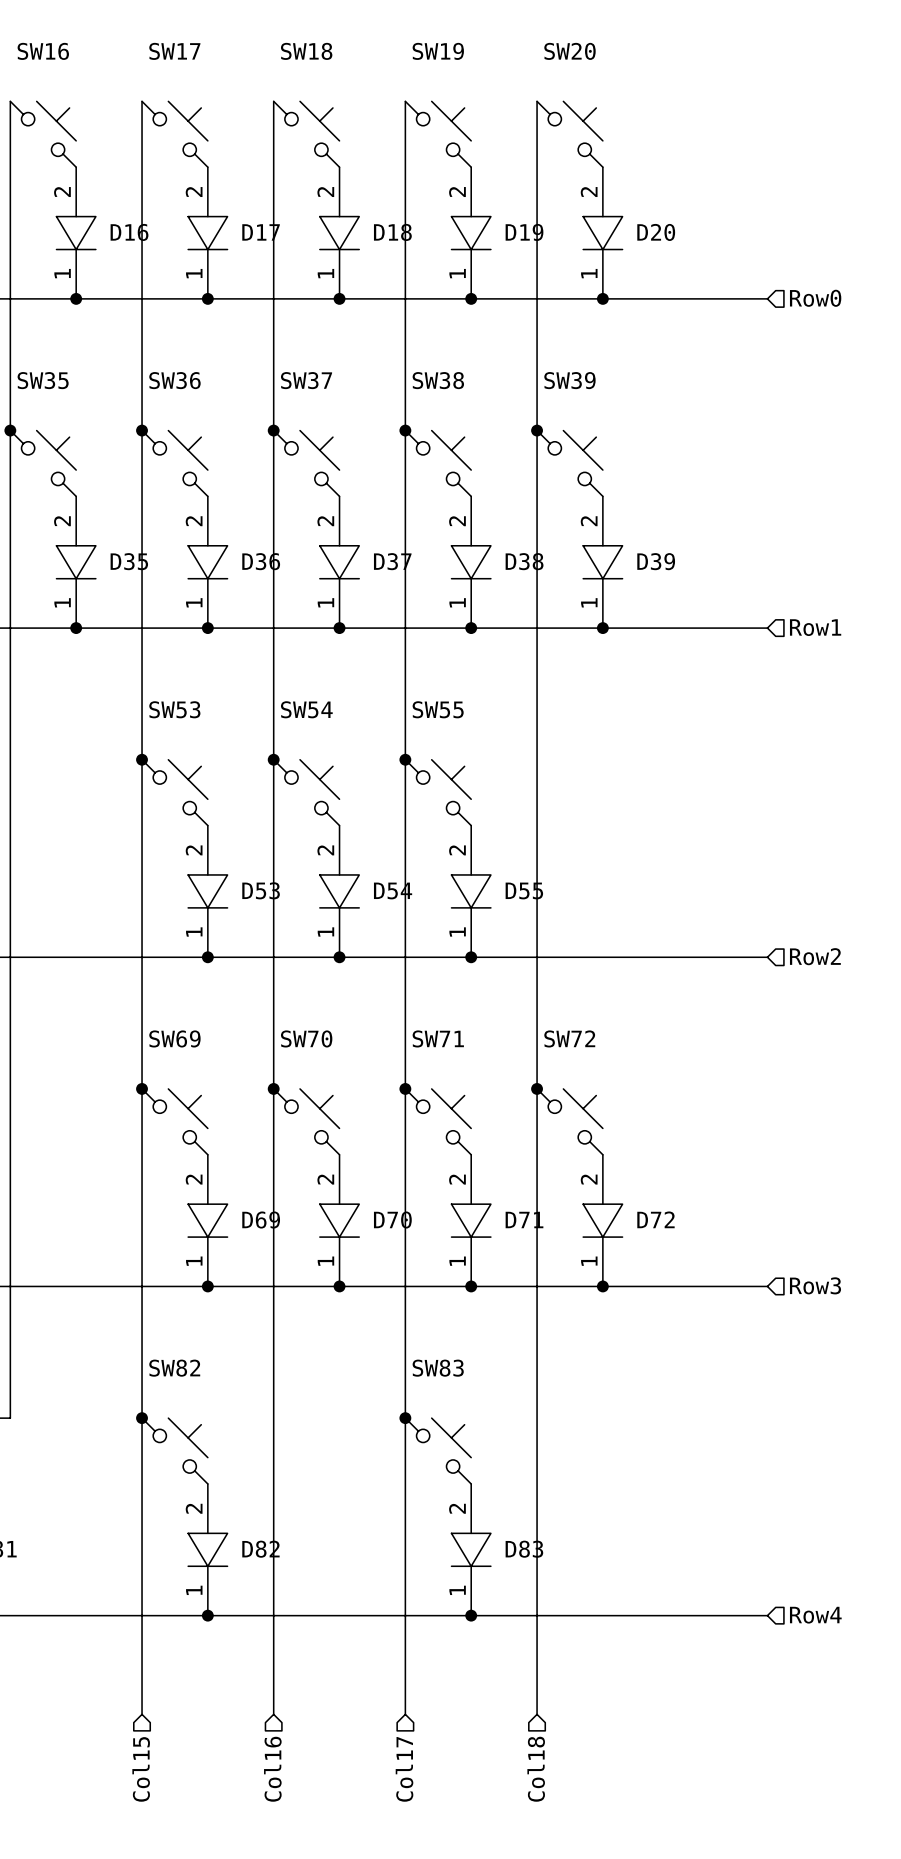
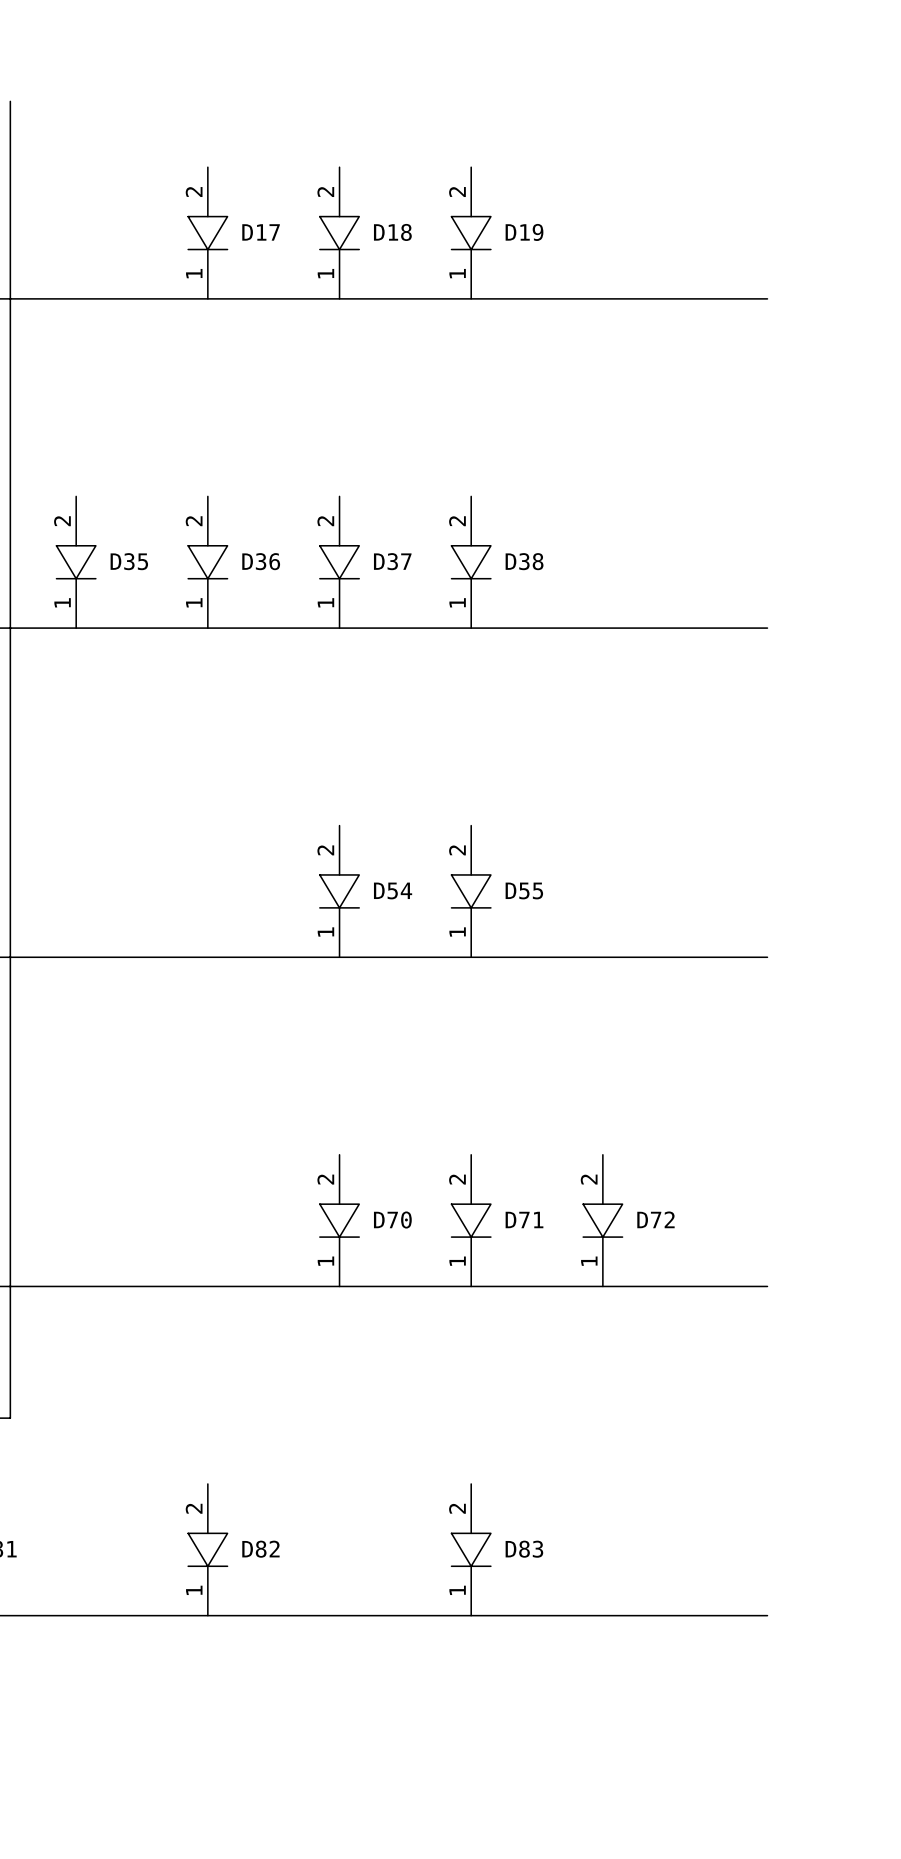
wire: (142, 101) (142, 1714) -> none
wire: (273, 101) (273, 1714) -> none
wire: (405, 101) (405, 1714) -> none
wire: (537, 101) (537, 1714) -> none
SW16: (43, 134) -> none
SW17: (174, 134) -> none
SW18: (306, 134) -> none
SW19: (438, 134) -> none
SW20: (569, 134) -> none
D16: (76, 233) -> none
D20: (602, 233) -> none
junction: (76, 298) -> none
junction: (207, 298) -> none
junction: (339, 298) -> none
junction: (471, 298) -> none
junction: (602, 298) -> none
hierarchical label: Row0 (815, 298) -> none
junction: (10, 430) -> none
junction: (142, 430) -> none
junction: (273, 430) -> none
junction: (405, 430) -> none
junction: (537, 430) -> none
SW35: (43, 463) -> none
SW36: (174, 463) -> none
SW37: (306, 463) -> none
SW38: (438, 463) -> none
SW39: (569, 463) -> none
D39: (602, 562) -> none
hierarchical label: Row1 (815, 627) -> none
junction: (76, 628) -> none
junction: (207, 628) -> none
junction: (339, 628) -> none
junction: (471, 628) -> none
junction: (602, 628) -> none
junction: (142, 759) -> none
junction: (273, 759) -> none
junction: (405, 759) -> none
SW53: (174, 792) -> none
SW54: (306, 792) -> none
SW55: (438, 792) -> none
D53: (207, 891) -> none
hierarchical label: Row2 (815, 956) -> none
junction: (207, 957) -> none
junction: (339, 957) -> none
junction: (471, 957) -> none
junction: (142, 1088) -> none
junction: (273, 1088) -> none
junction: (405, 1088) -> none
junction: (537, 1088) -> none
SW69: (174, 1121) -> none
SW70: (306, 1121) -> none
SW71: (438, 1121) -> none
SW72: (569, 1121) -> none
D69: (207, 1220) -> none
hierarchical label: Row3 (815, 1285) -> none
junction: (207, 1286) -> none
junction: (339, 1286) -> none
junction: (471, 1286) -> none
junction: (602, 1286) -> none
junction: (142, 1418) -> none
junction: (405, 1418) -> none
SW82: (174, 1451) -> none
SW83: (438, 1451) -> none
junction: (207, 1615) -> none
junction: (471, 1615) -> none
hierarchical label: Row4 (815, 1615) -> none
hierarchical label: Col15 (141, 1769) -> none
hierarchical label: Col16 (272, 1769) -> none
hierarchical label: Col17 (404, 1769) -> none
hierarchical label: Col18 (536, 1769) -> none

